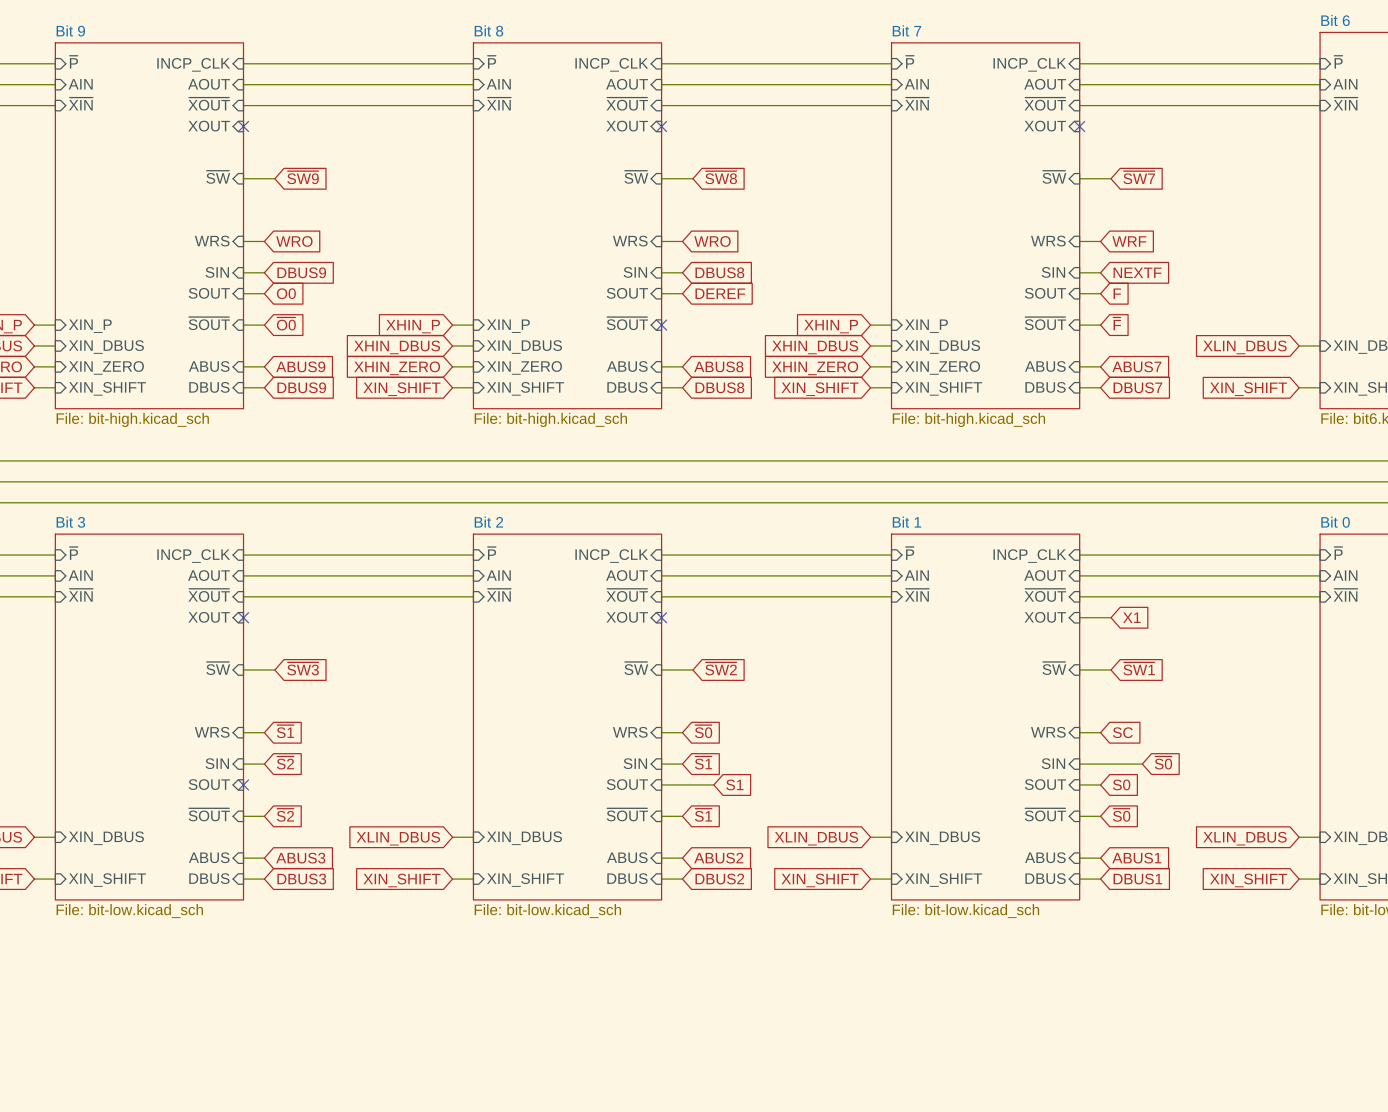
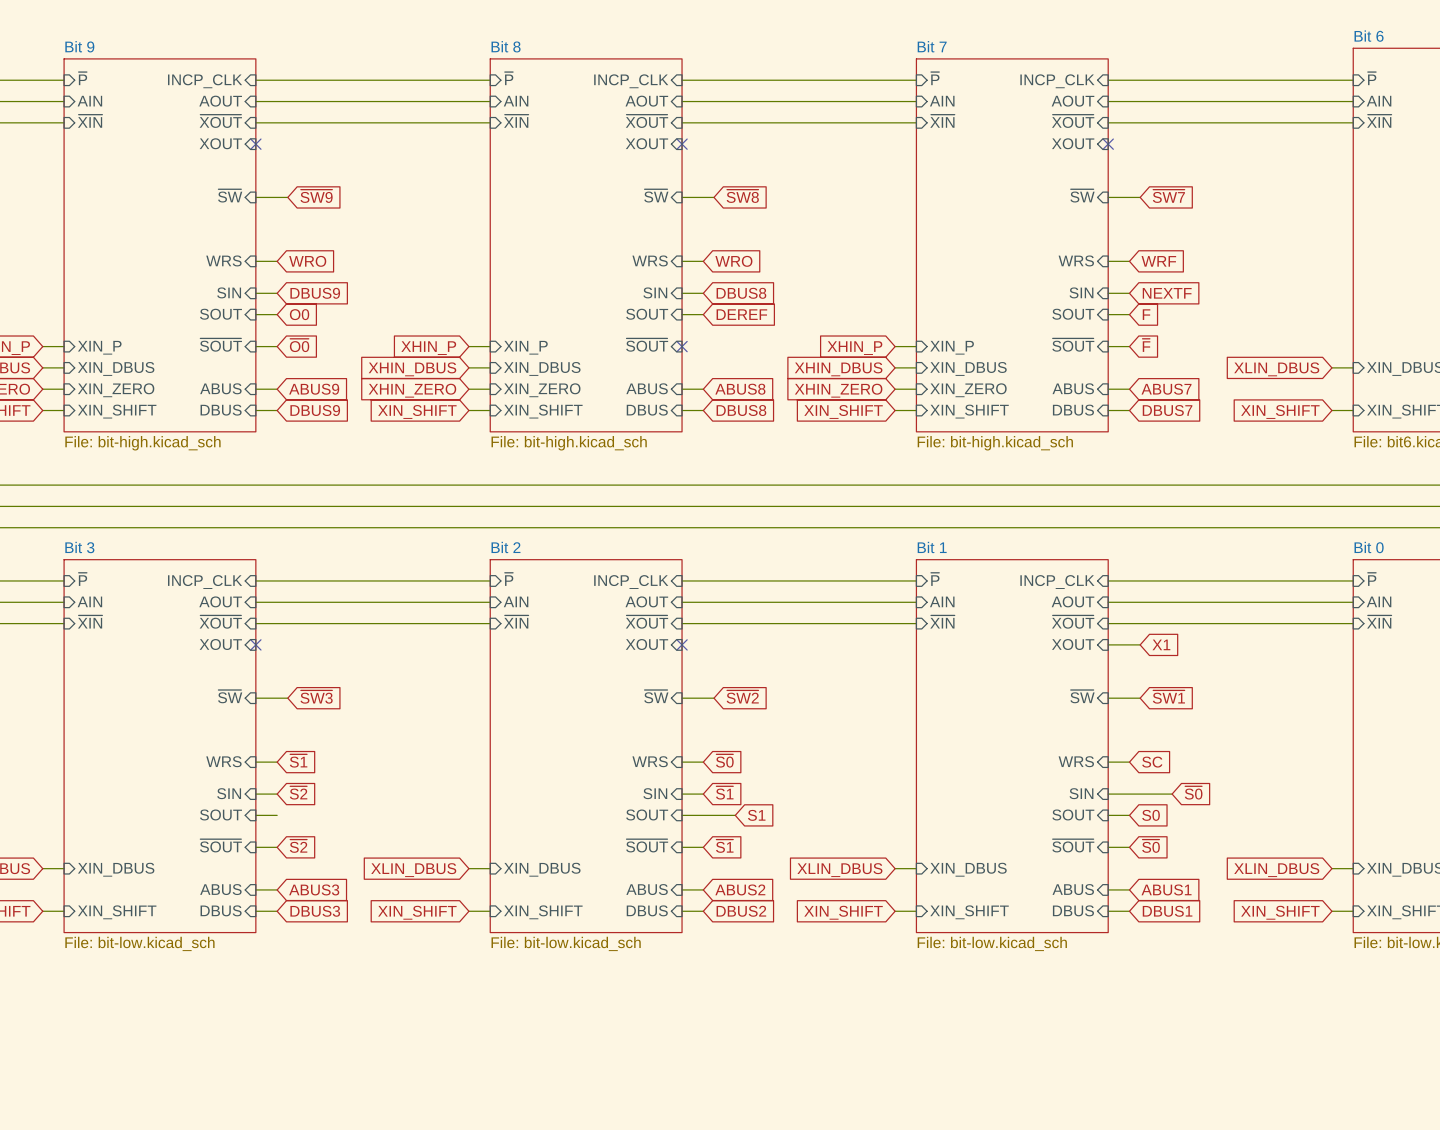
wire: none -> (255, 815) (277, 815)
no-connect mark: (243, 784) -> none

